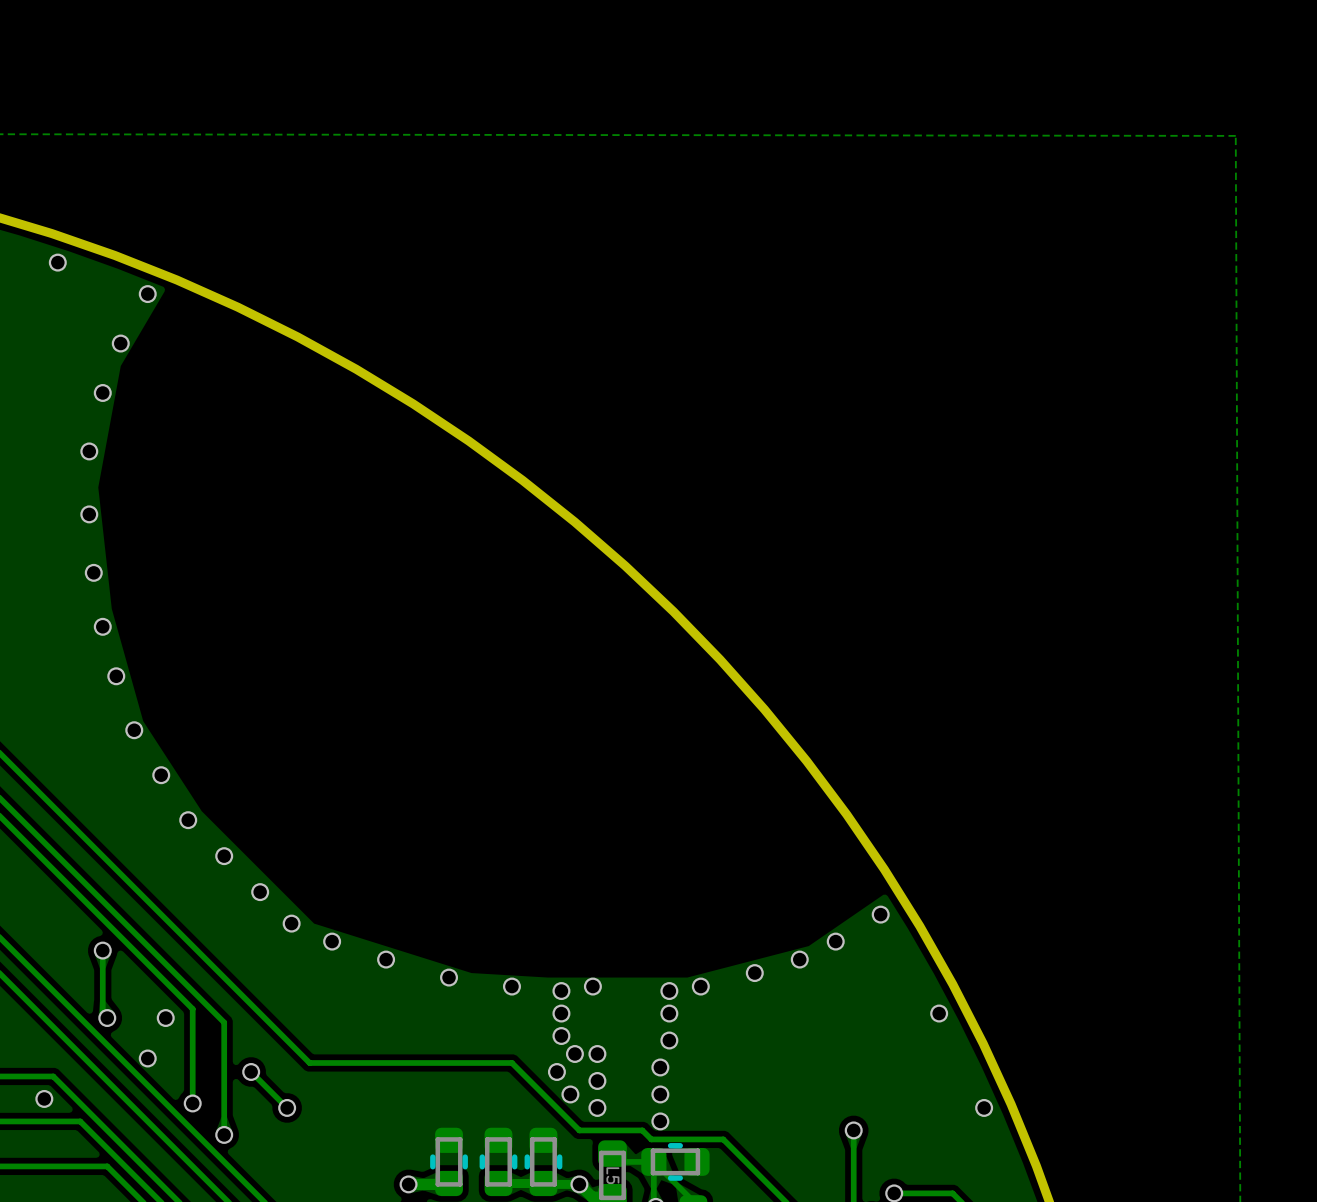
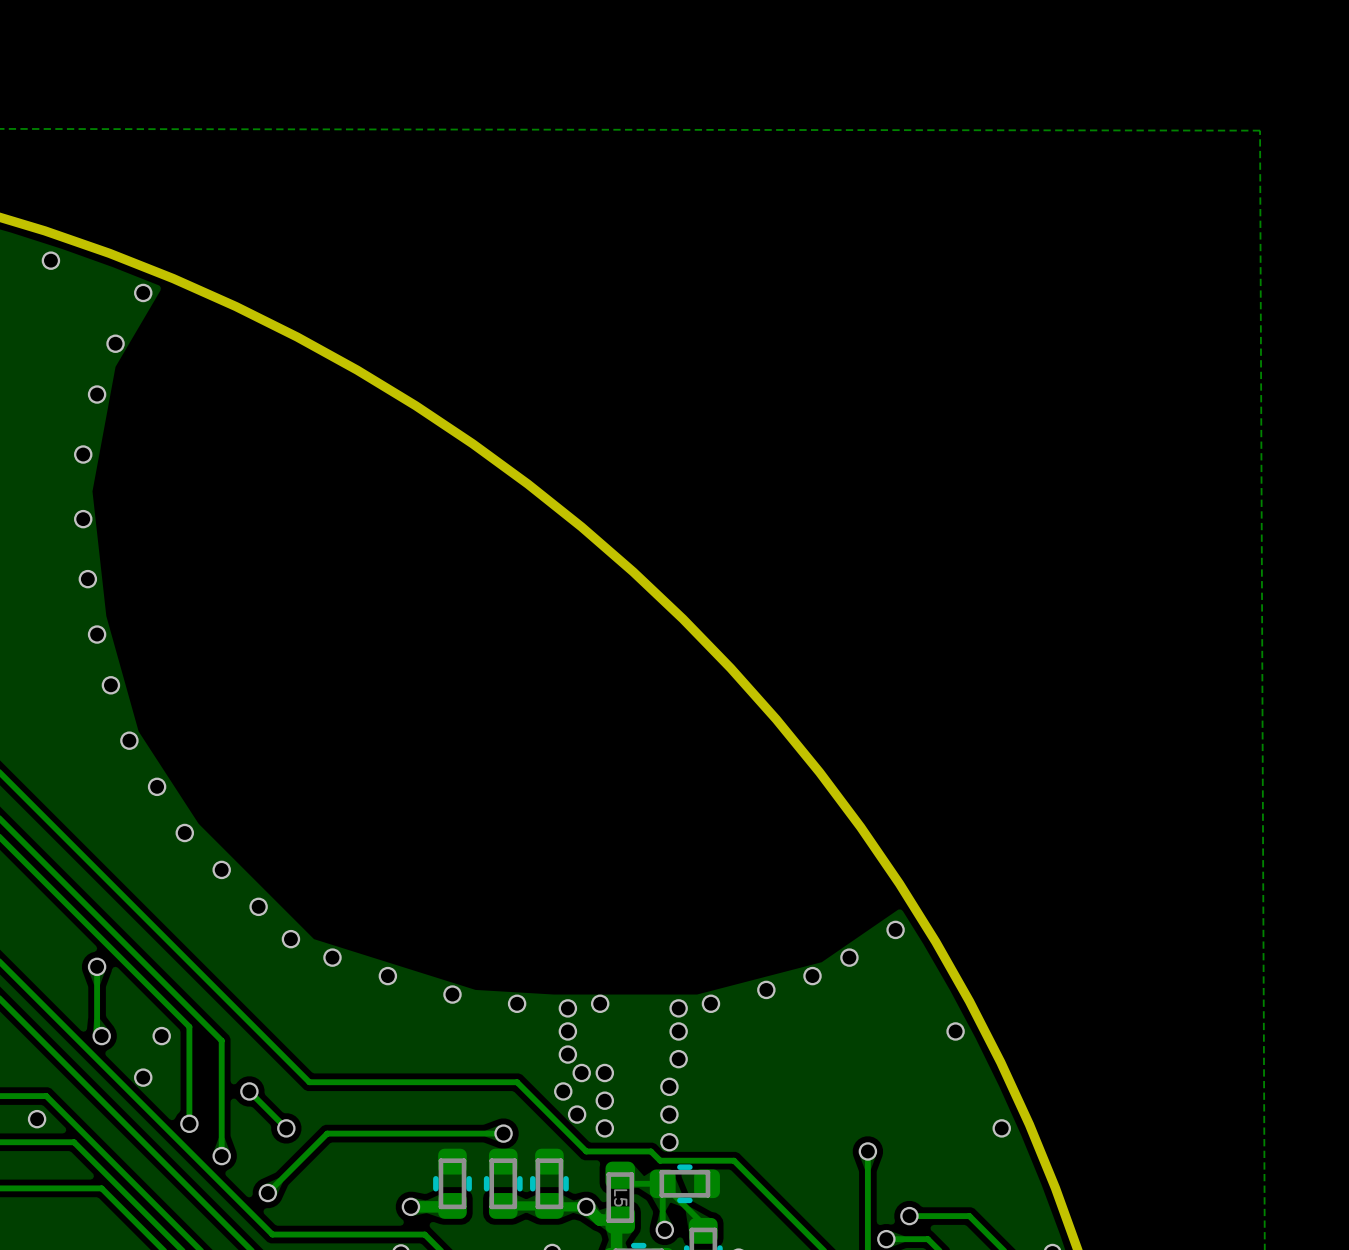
track: none -> (503, 1133) (327, 1133) (267, 1193)
via: none -> (503, 1133)
via: none -> (267, 1193)

